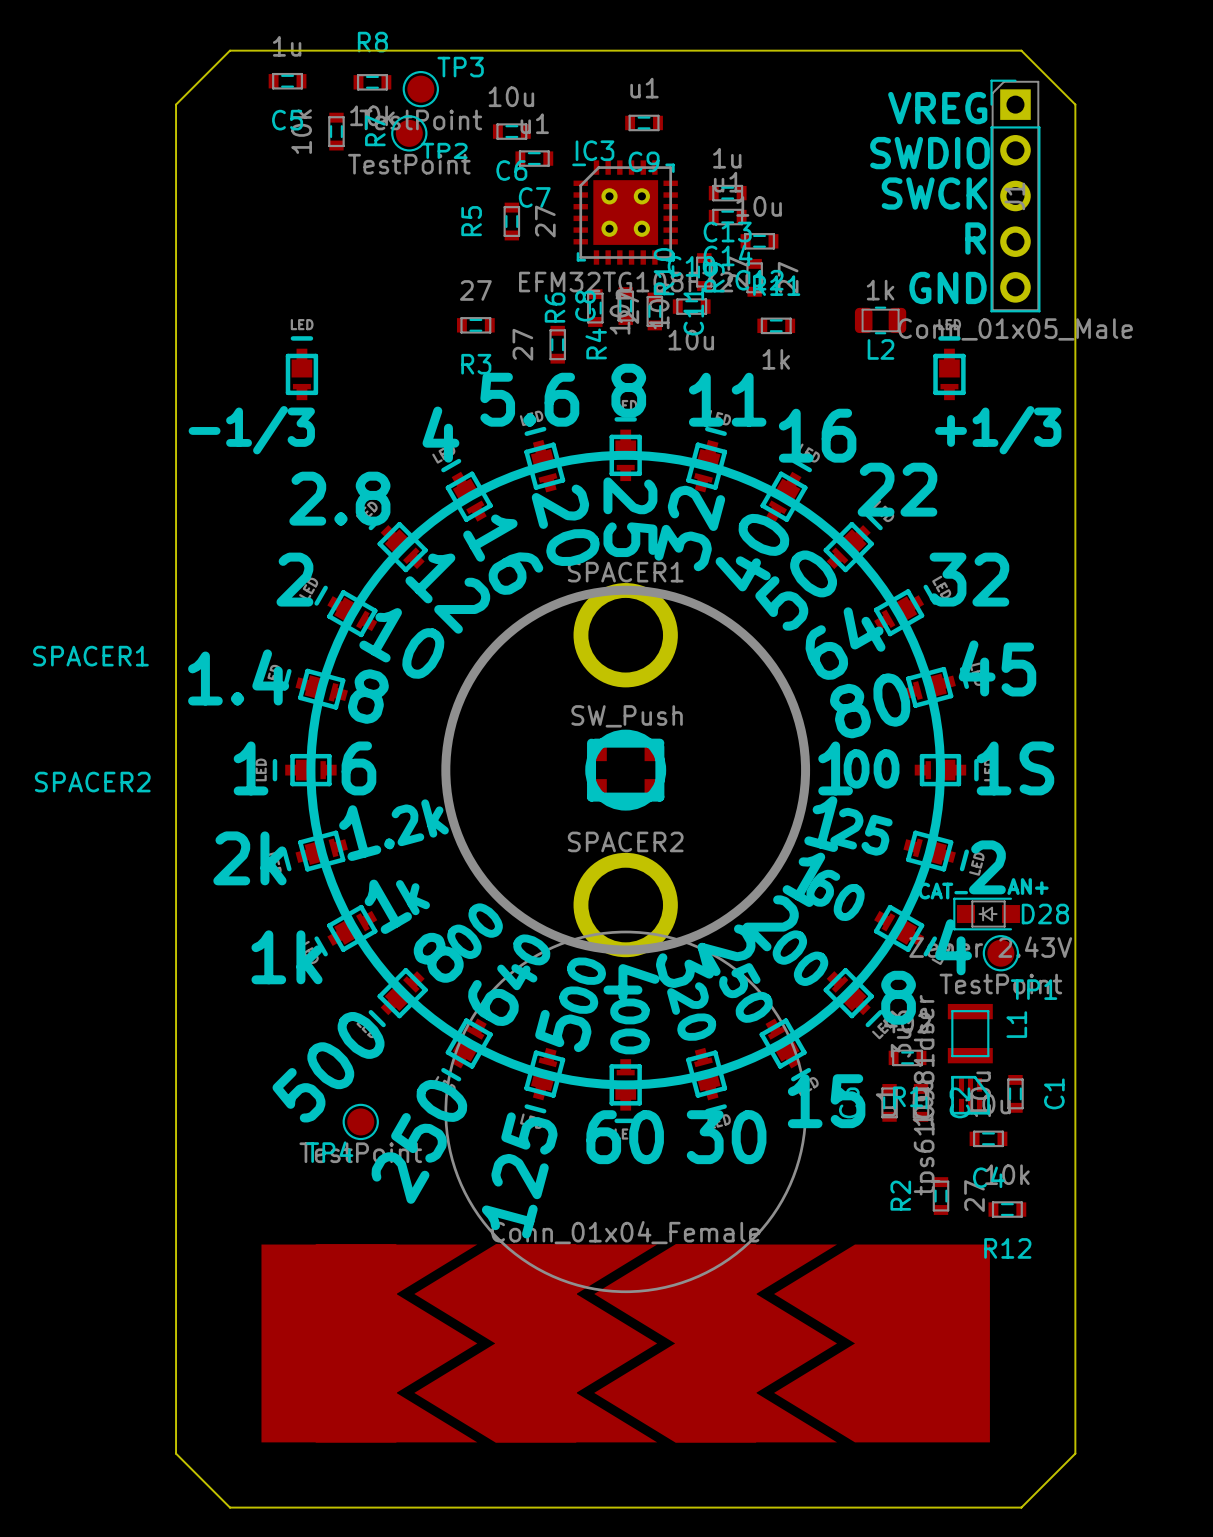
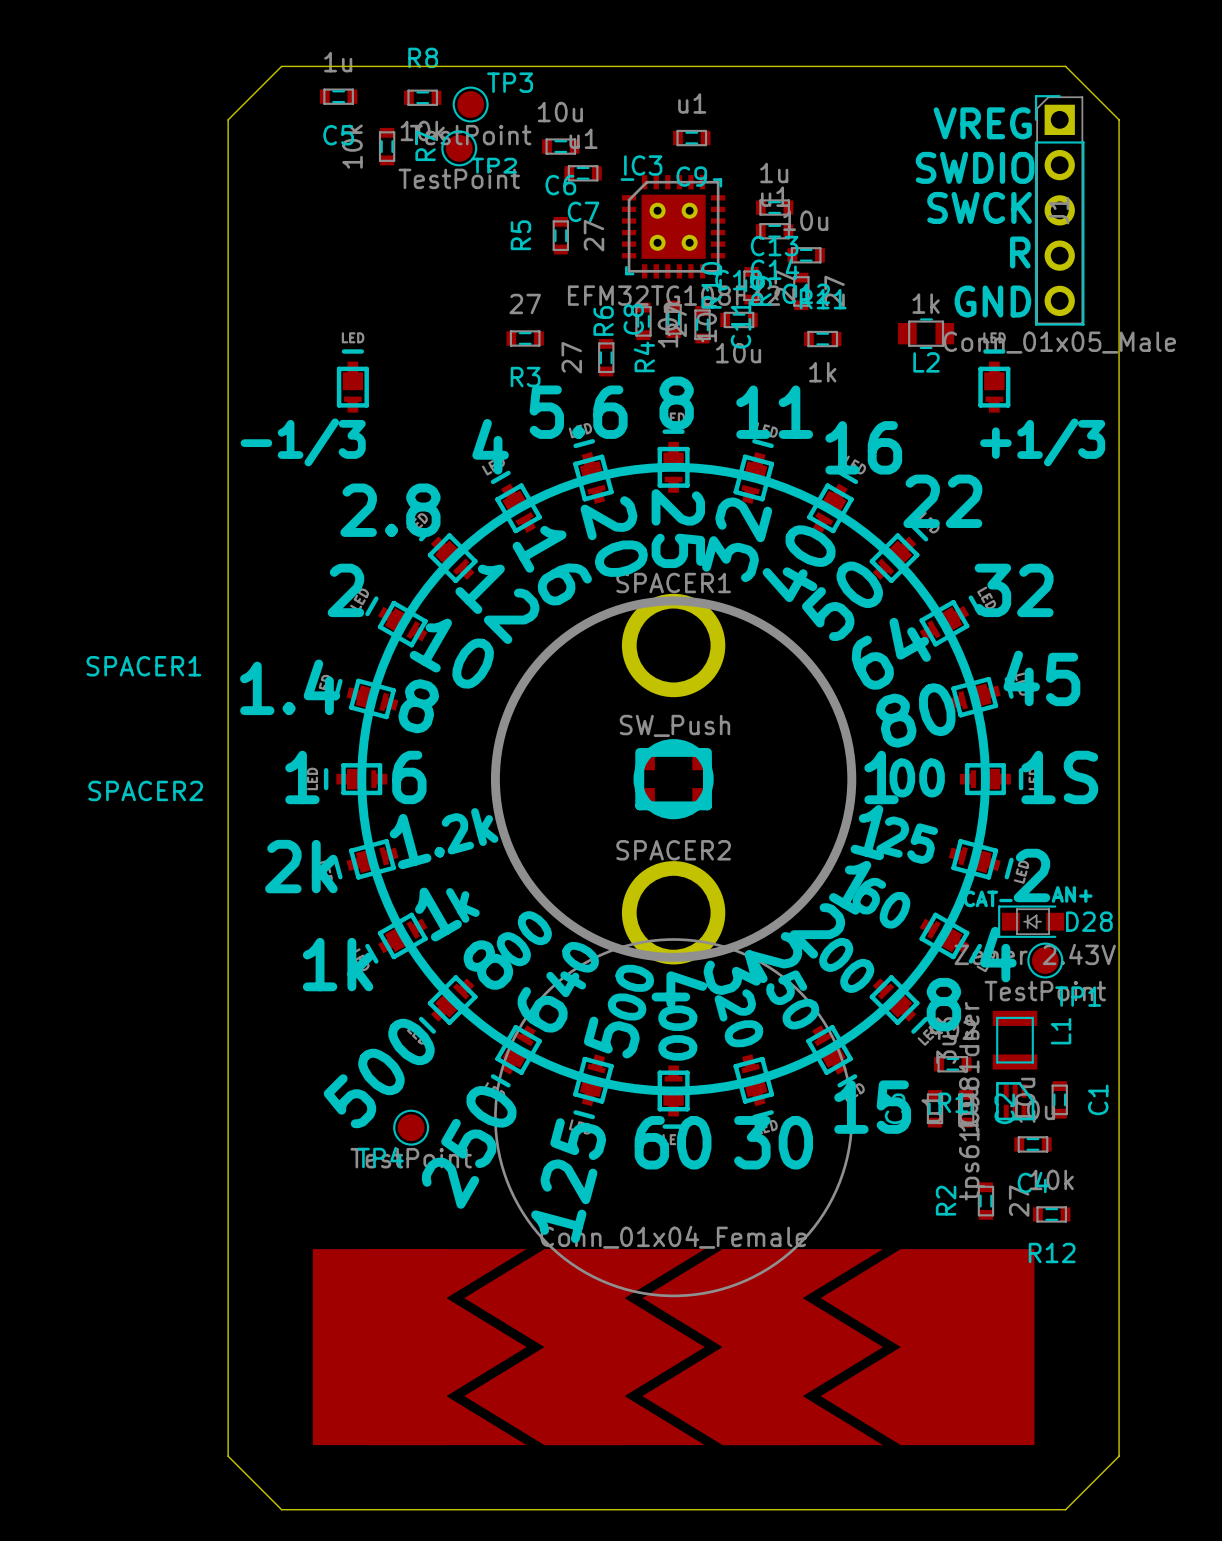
L2 footprint: [854, 306, 907, 335] -> [898, 318, 955, 350]

